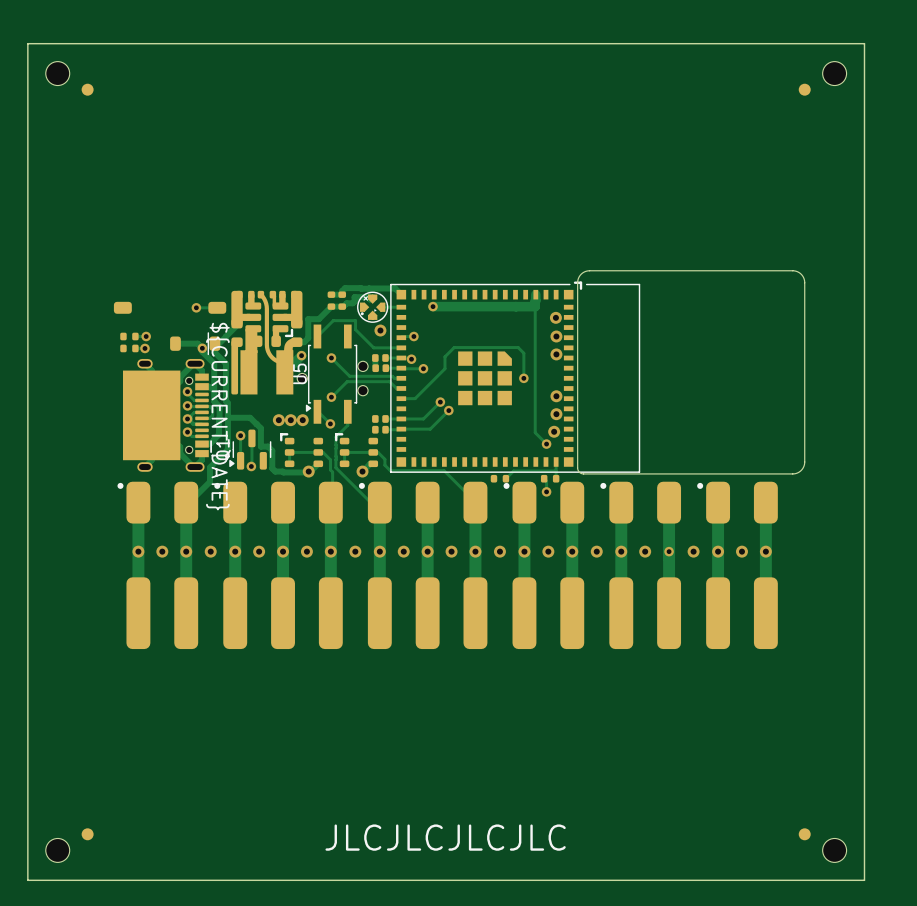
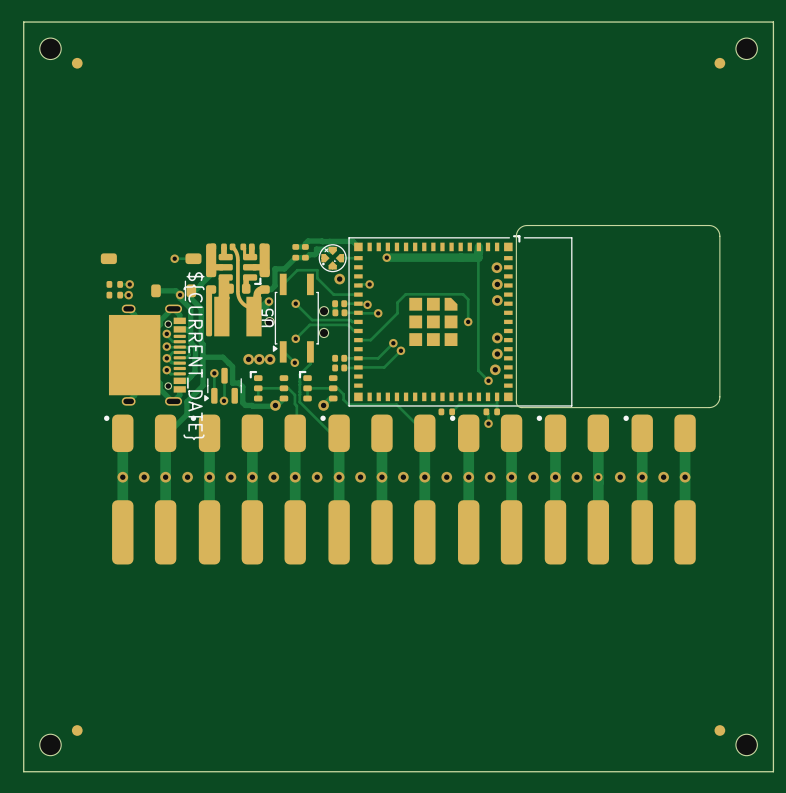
Q1 name: Q1 (223, 449) -> none
part text: JLCJLCJLCJLC (445, 837) -> none

